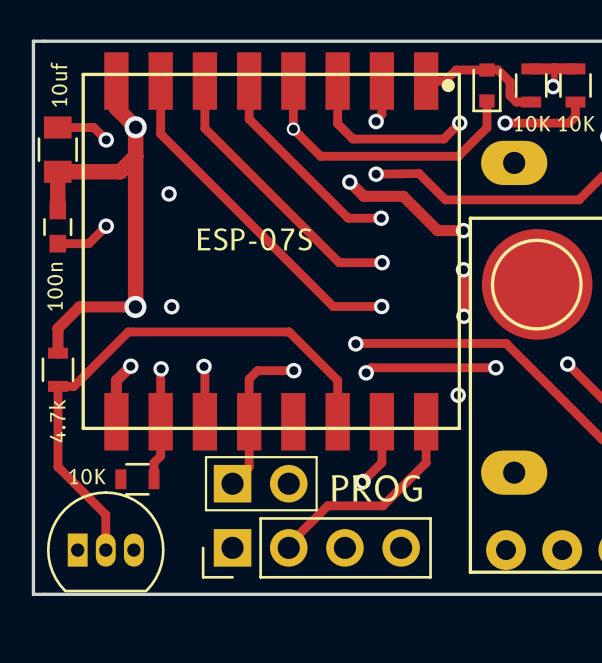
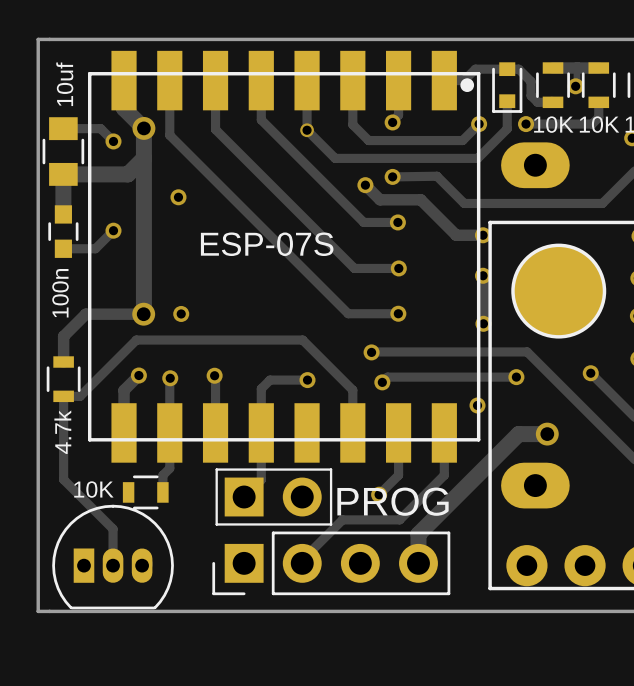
part footprint: [481, 229, 593, 340] -> [513, 245, 605, 337]
track: none -> (547, 434) (518, 434) (418, 534) (418, 563)
via: none -> (547, 434)

